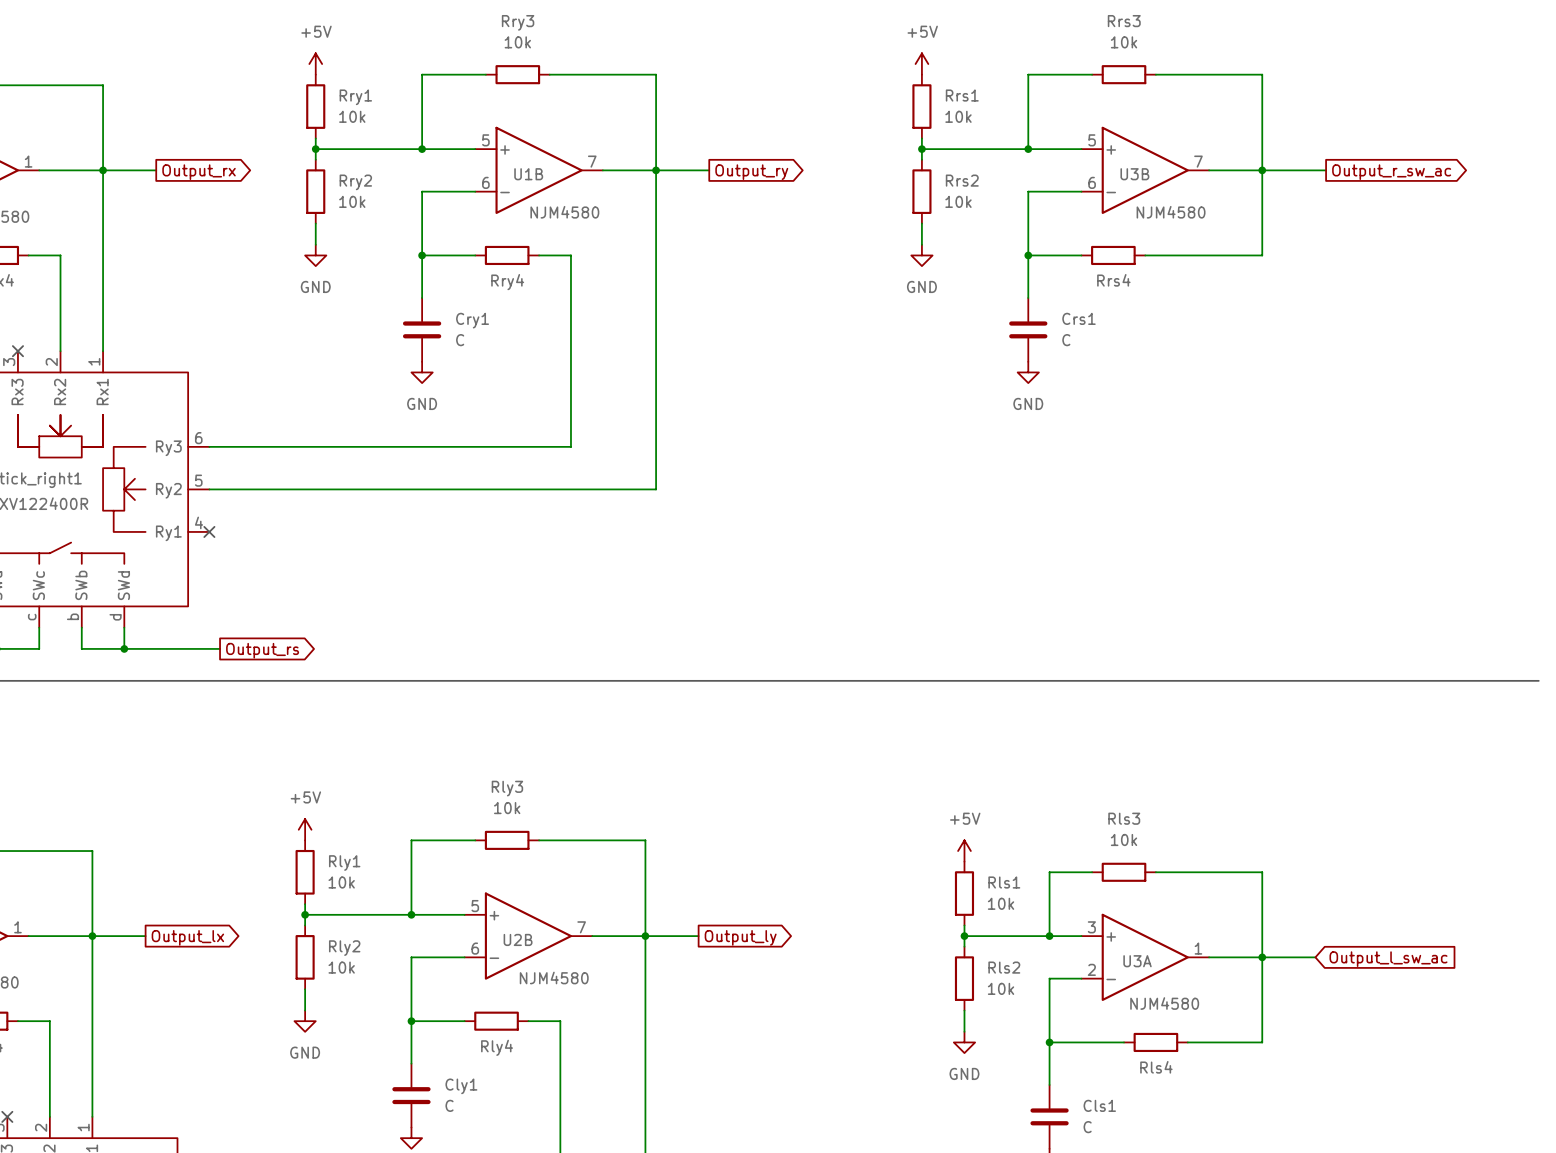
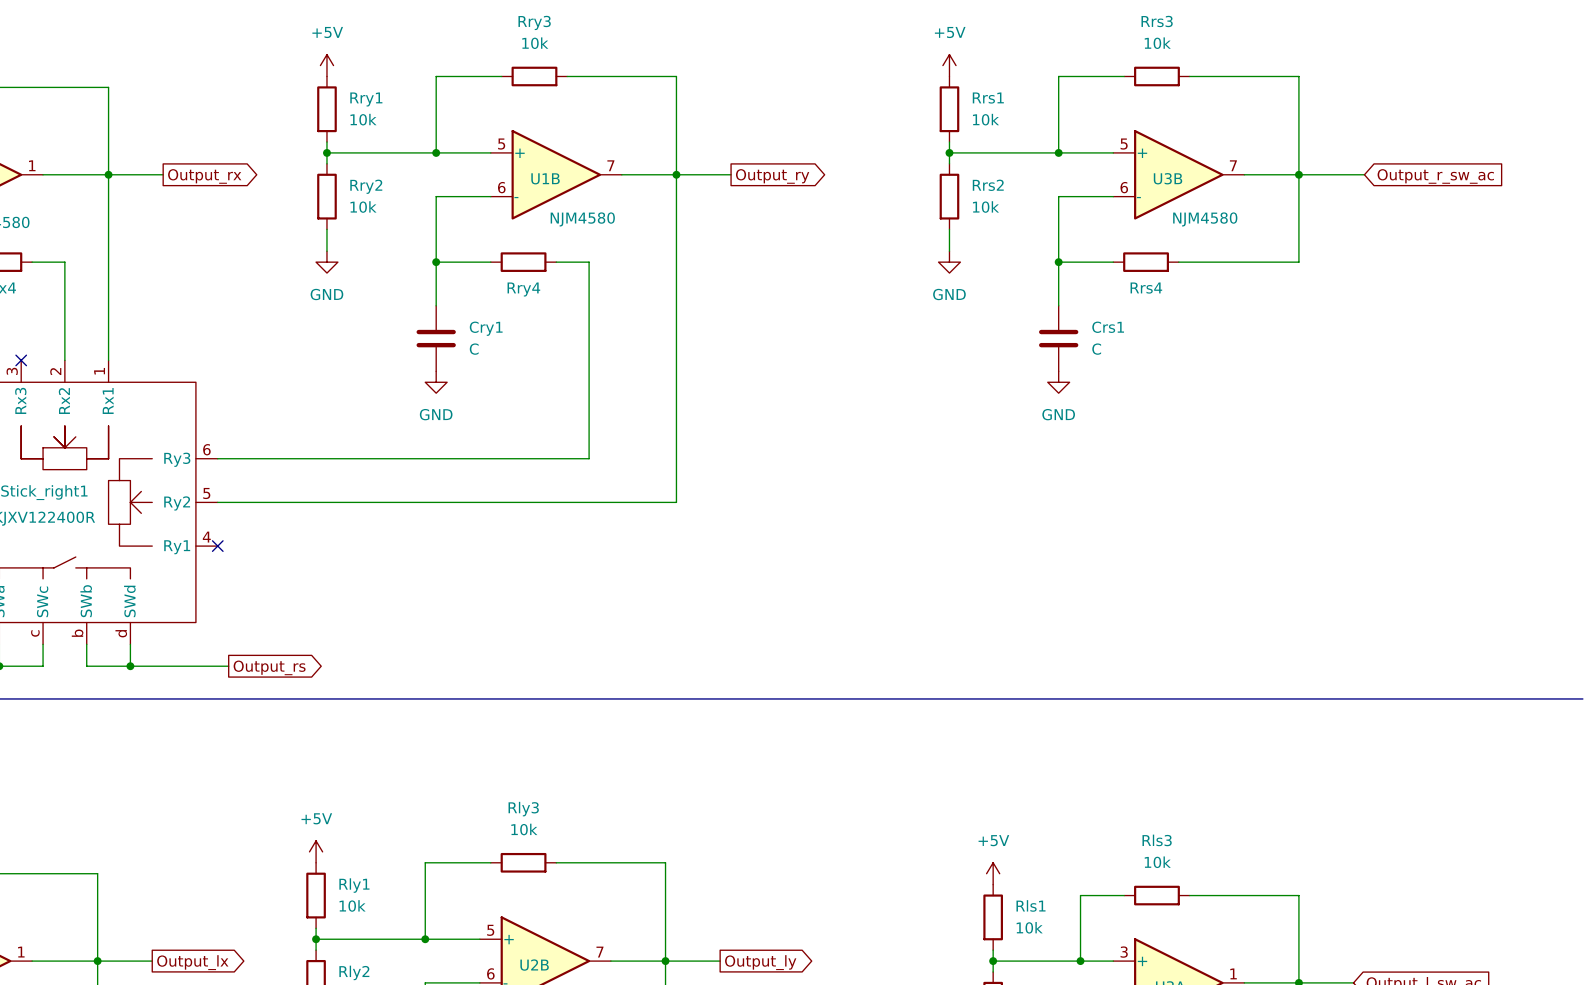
global label shape: output (1391, 172) -> input (1435, 176)

